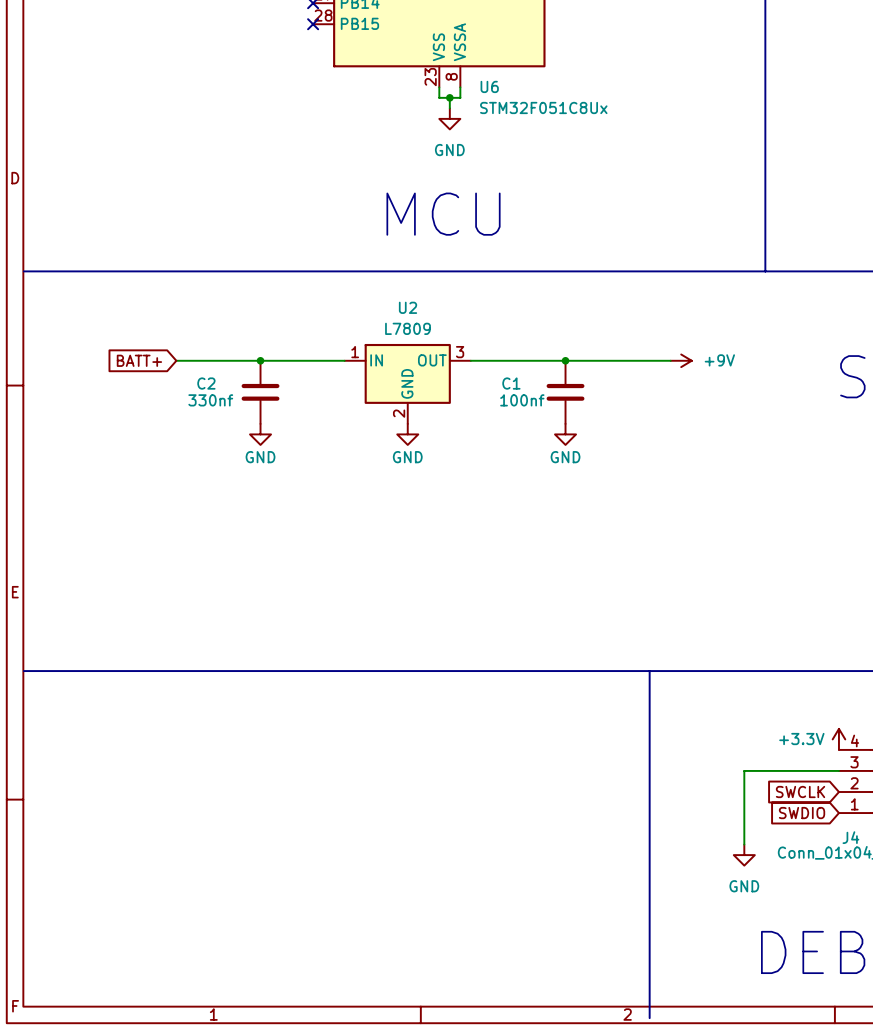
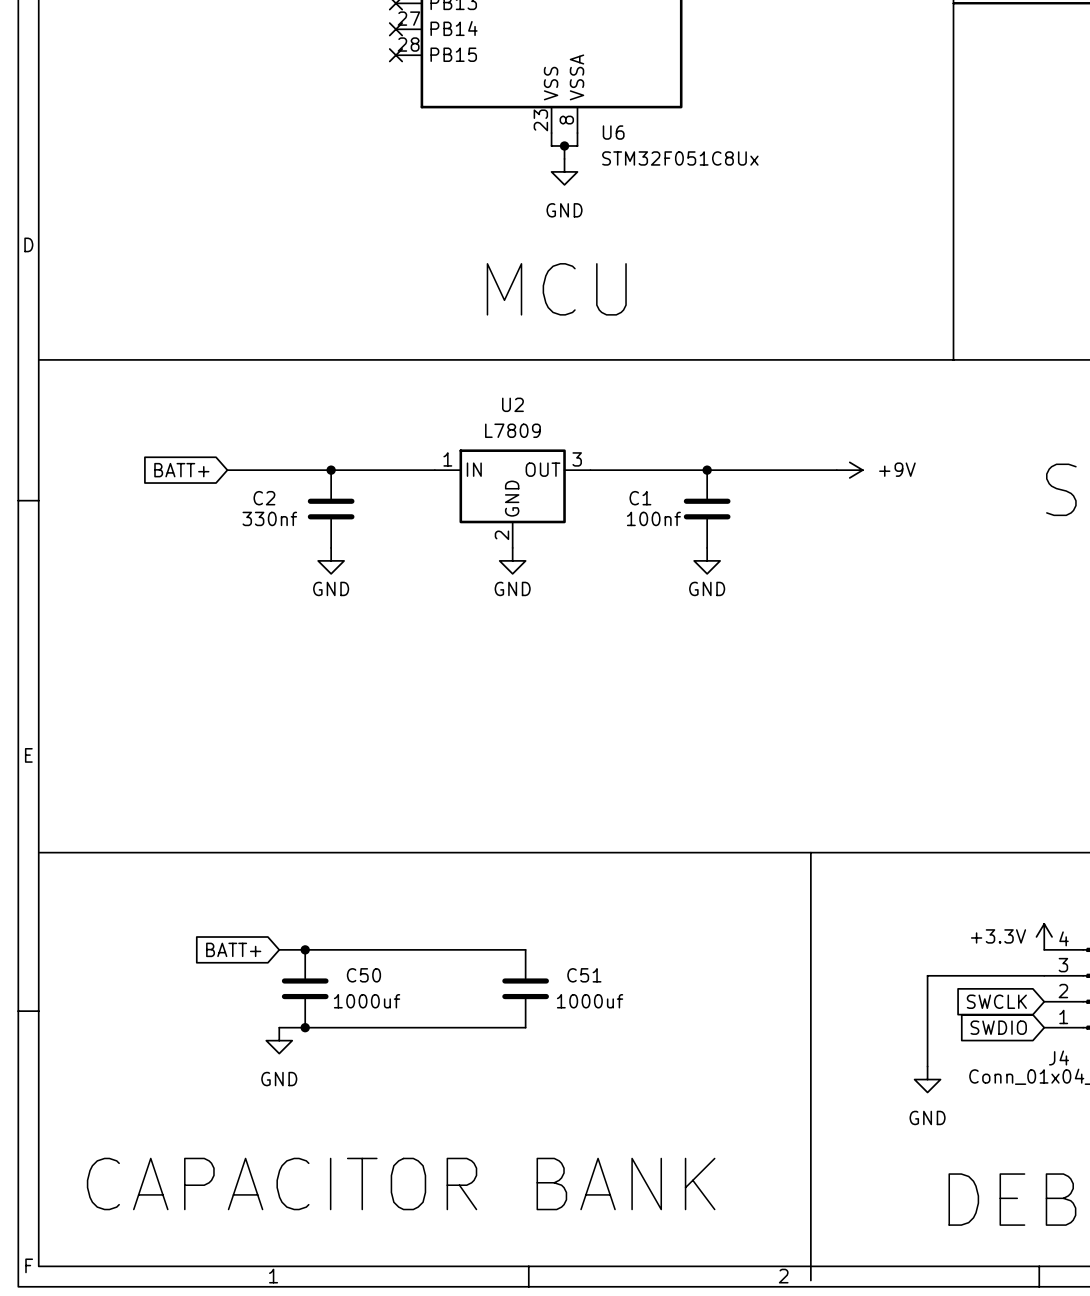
global label: none -> BATT+ (233, 949)
wire: none -> (279, 949) (525, 949)
junction: none -> (305, 949)
C50: none -> 1000uf (305, 988)
C51: none -> 1000uf (525, 988)
wire: none -> (279, 1027) (525, 1027)
junction: none -> (305, 1027)
power symbol: none -> GND (279, 1040)
text: none -> CAPACITOR BANK (401, 1183)

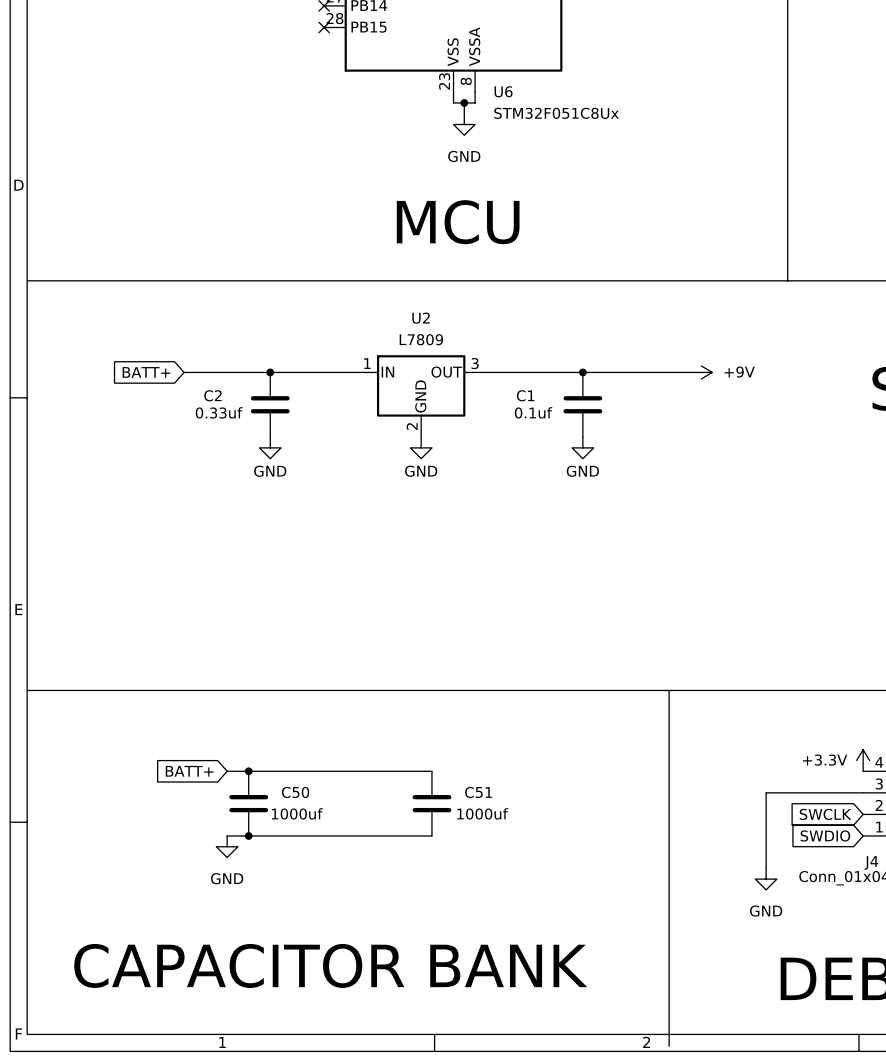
C2 value: 330nf (269, 518) -> 0.33uf (219, 412)
C1 value: 100nf (653, 518) -> 0.1uf (533, 412)

